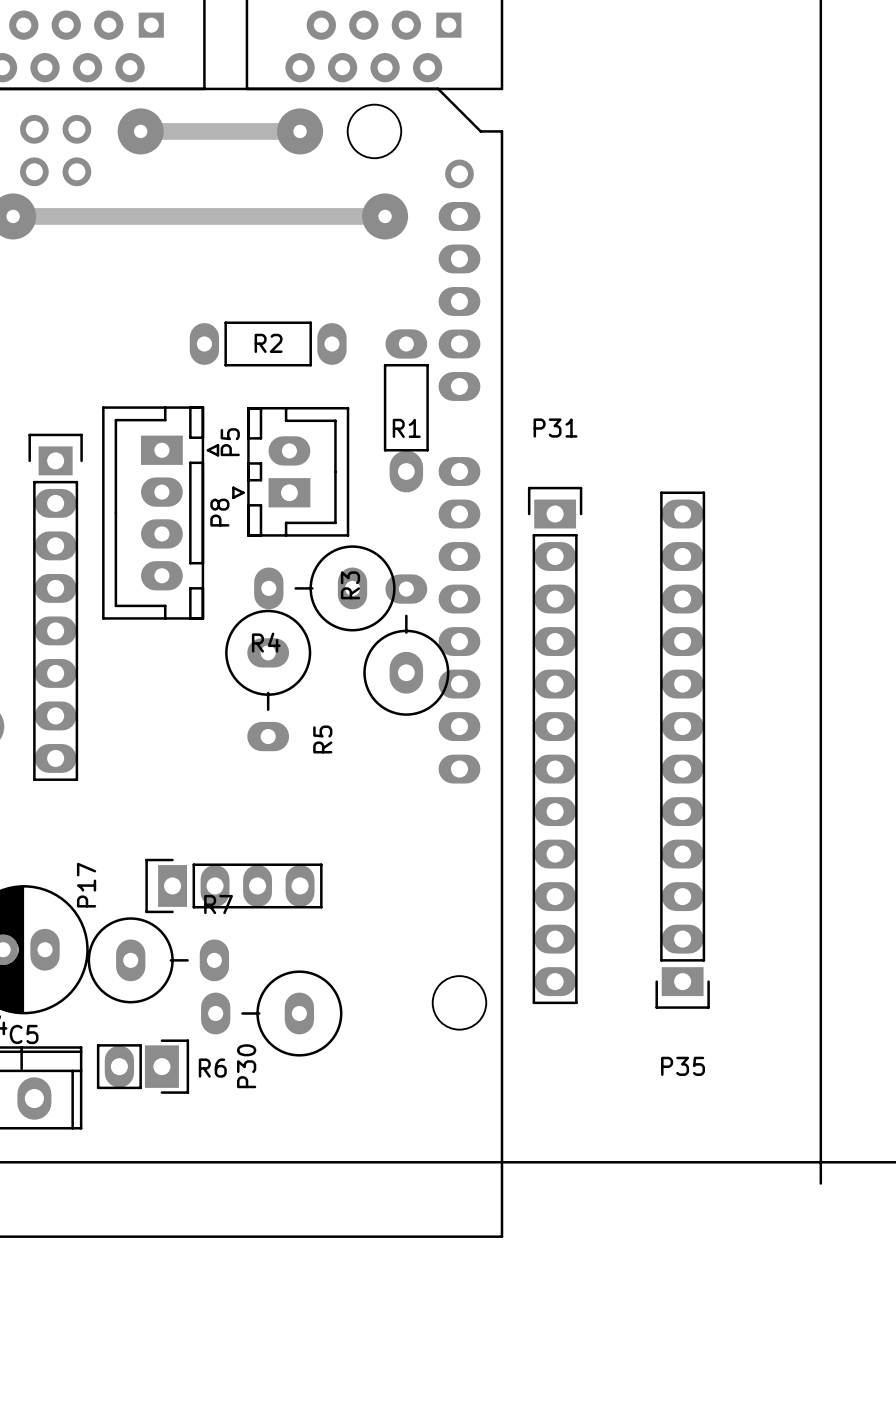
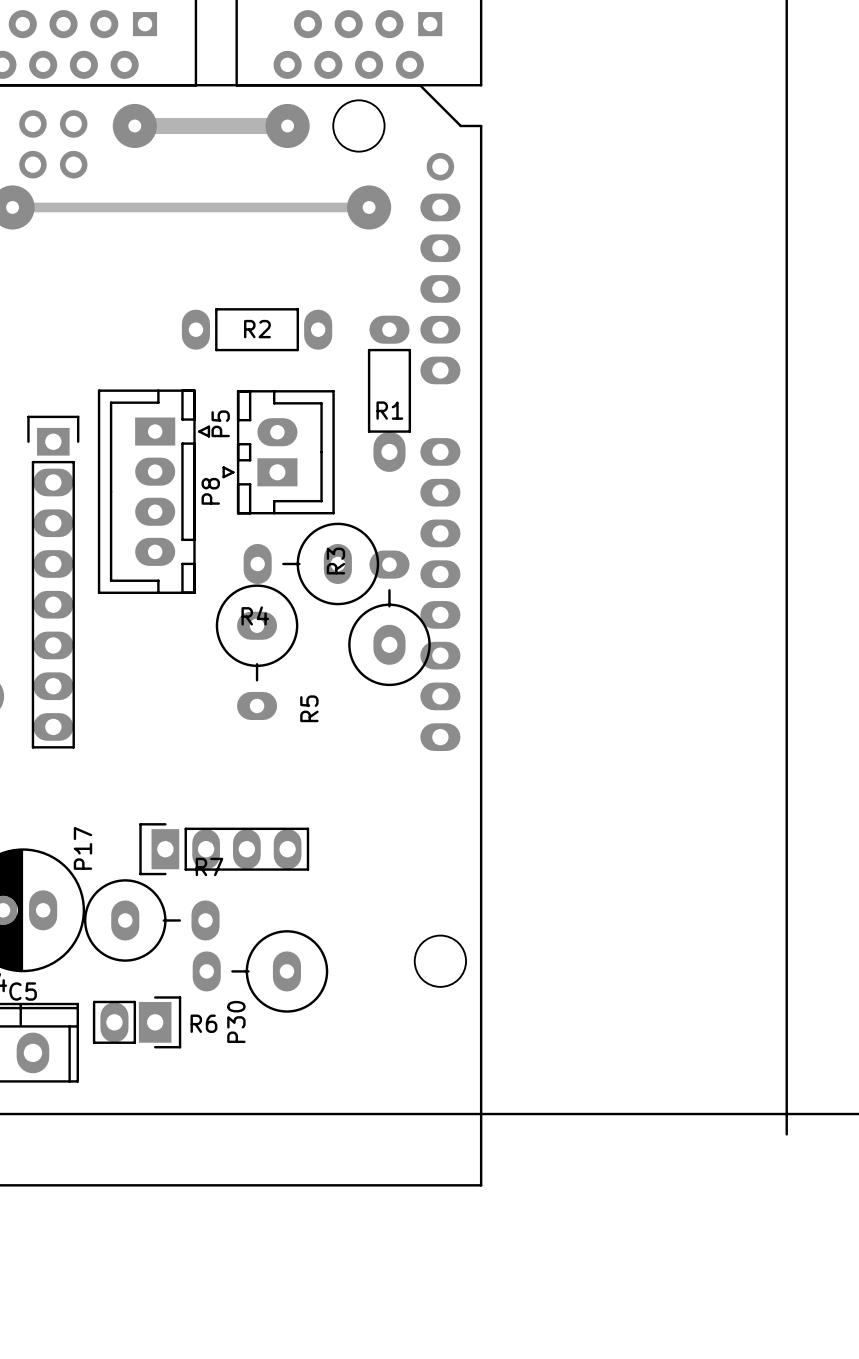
track width: thick (13, 216) (385, 216) -> thin (12, 207) (369, 207)
P31: (555, 745) -> none
P35: (682, 750) -> none

